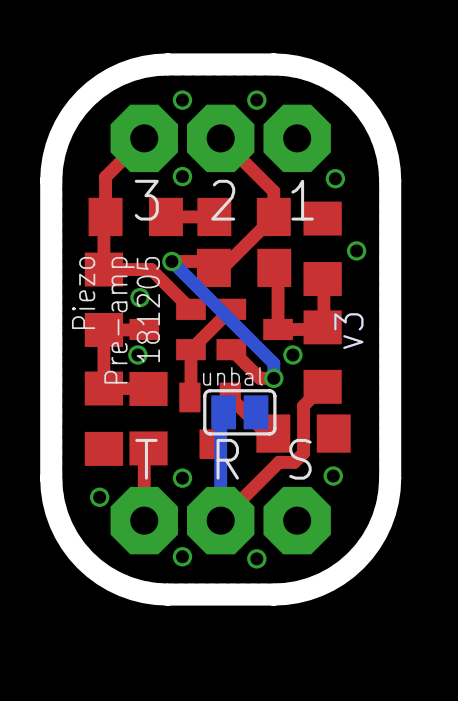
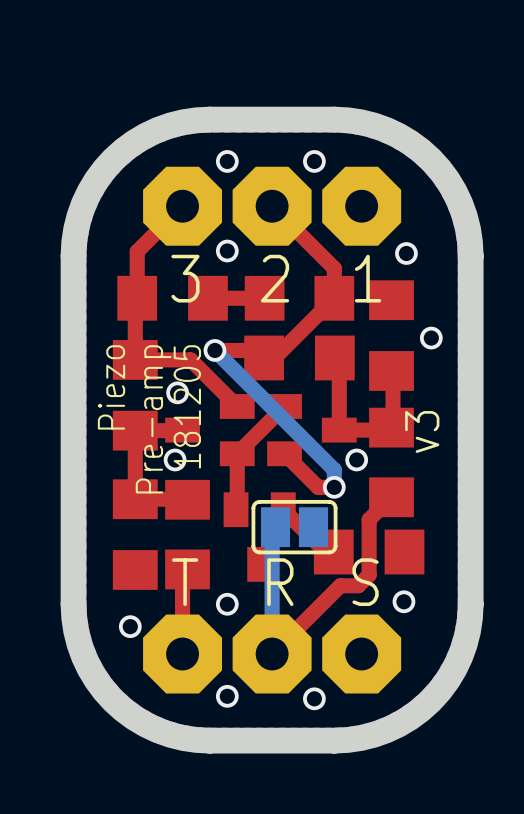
text: unbal (232, 376) -> none

